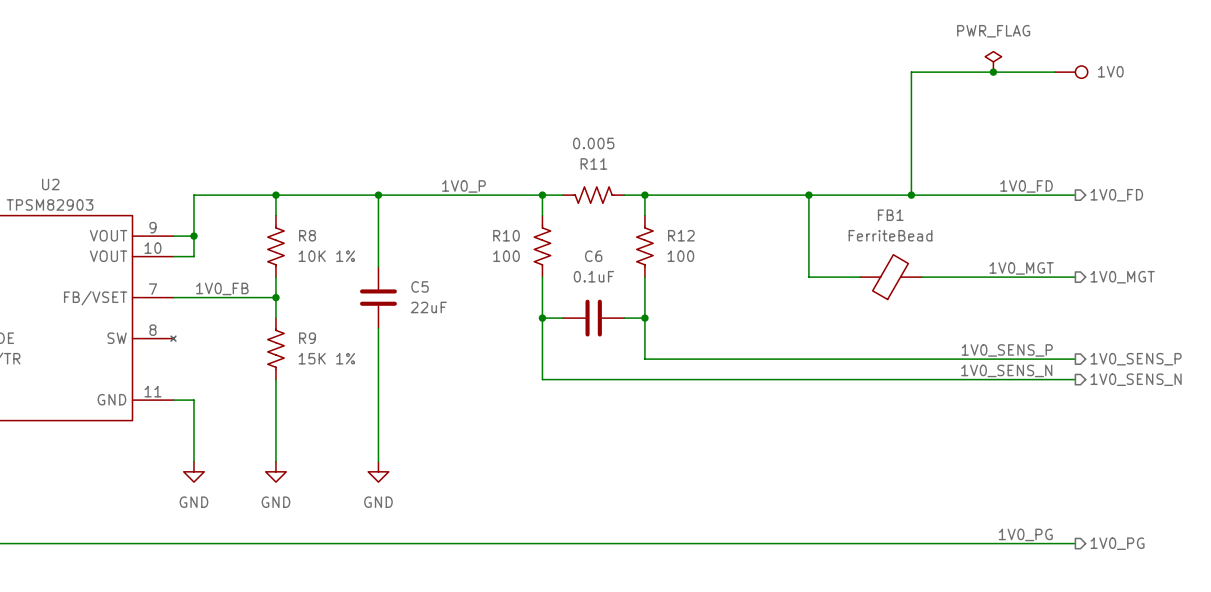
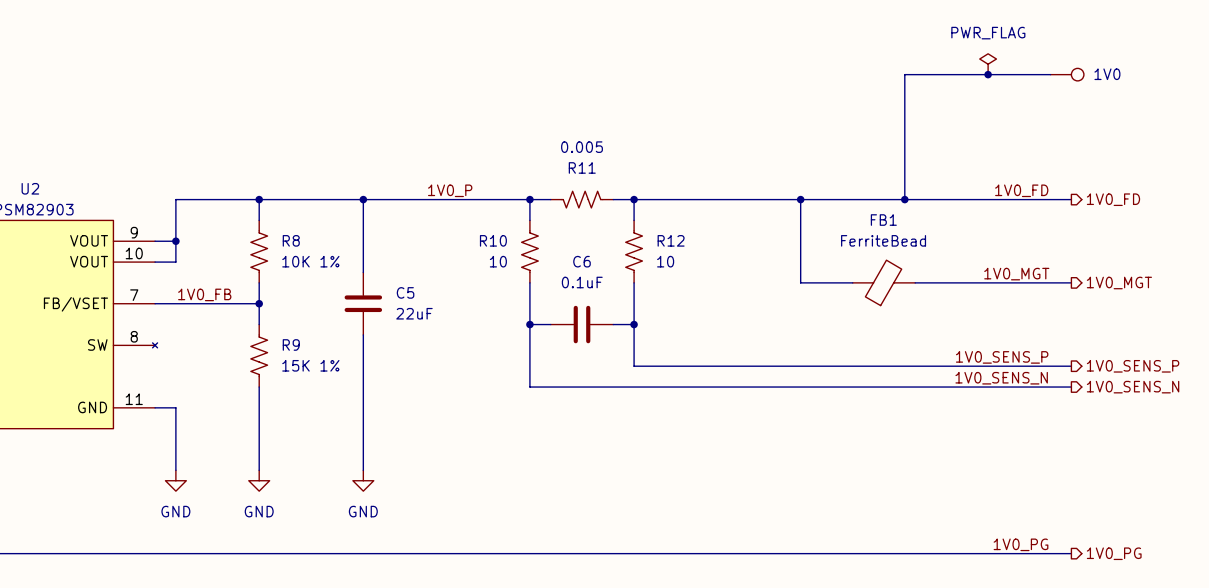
R10 value: 100 (506, 256) -> 10 (498, 261)
R12 value: 100 (680, 256) -> 10 (665, 261)

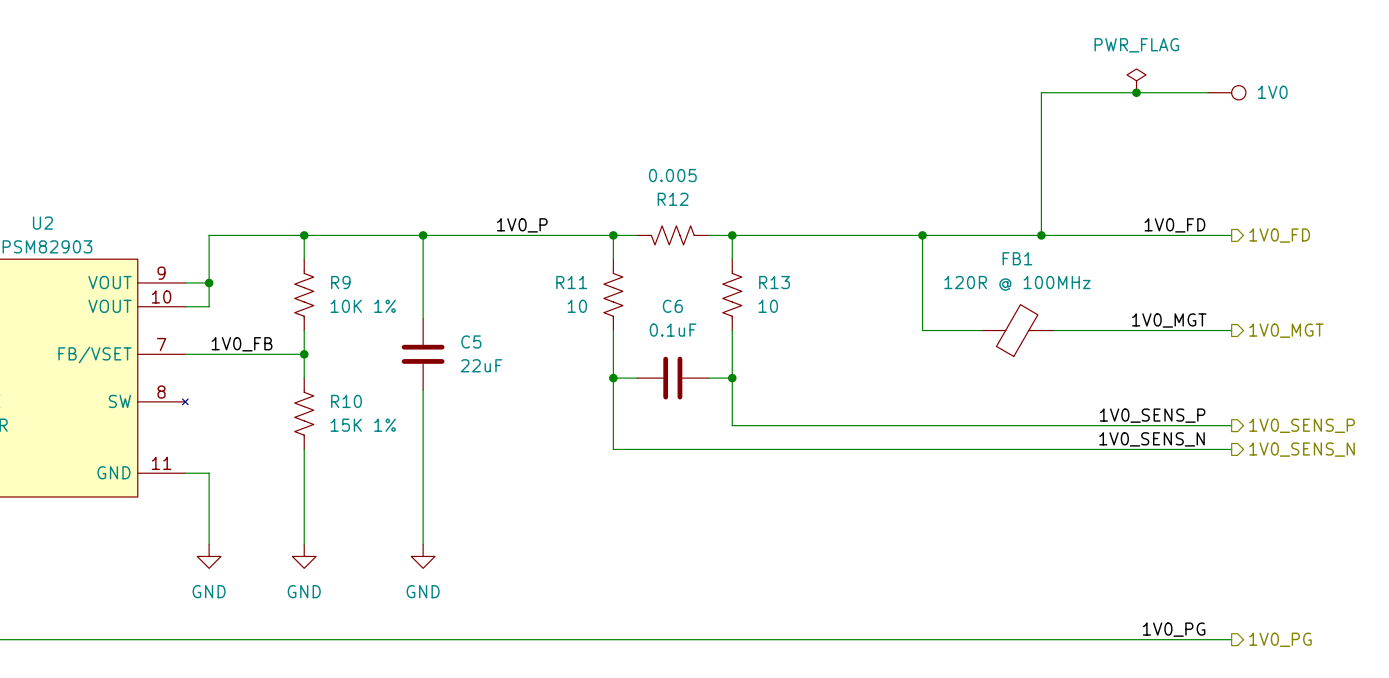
R11 name: R11 (582, 167) -> R12 (673, 199)
R8 name: R8 (291, 240) -> R9 (340, 282)
R10 name: R10 (493, 240) -> R11 (571, 282)
R12 name: R12 (671, 240) -> R13 (774, 282)
FB1 value: FerriteBead (883, 240) -> 120R @ 100MHz (1017, 283)
R9 name: R9 (291, 344) -> R10 (346, 401)

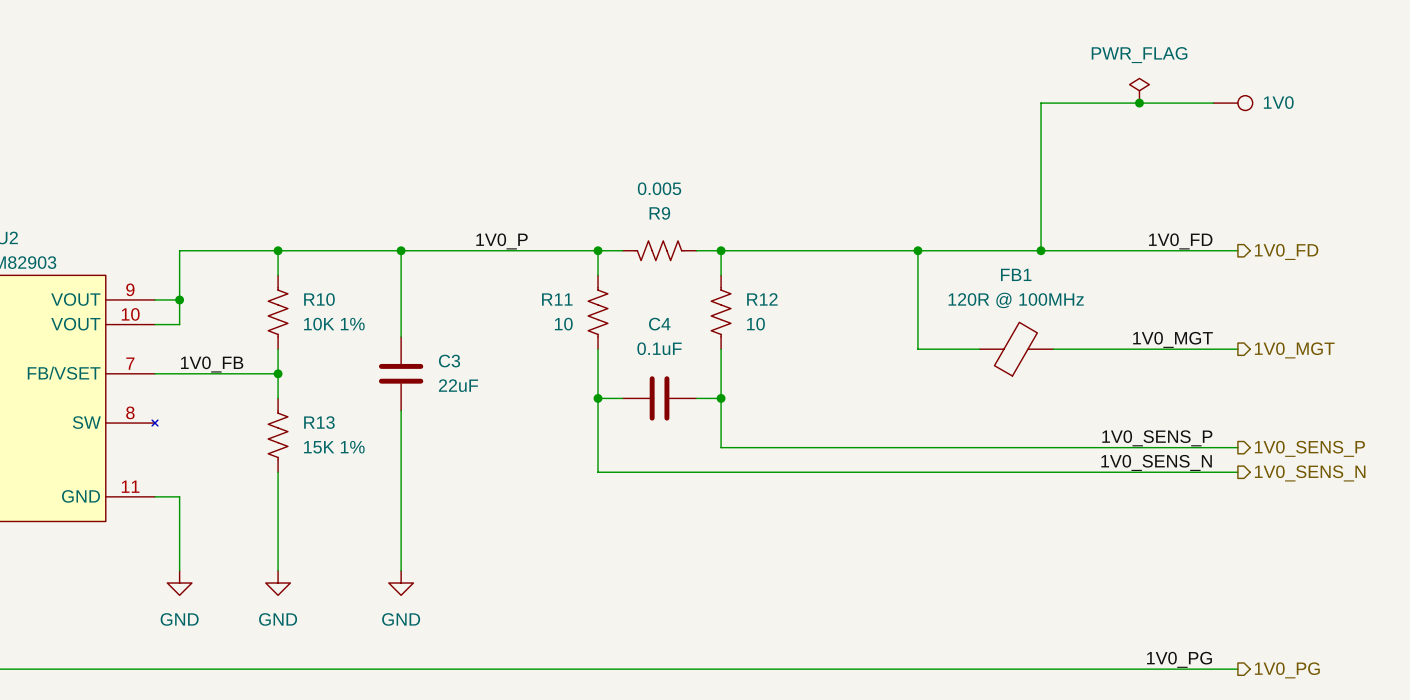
R12 name: R12 (673, 199) -> R9 (659, 213)
R9 name: R9 (340, 282) -> R10 (319, 299)
R13 name: R13 (774, 282) -> R12 (762, 299)
C6 name: C6 (672, 306) -> C4 (659, 324)
C5 name: C5 (471, 341) -> C3 (449, 361)
R10 name: R10 (346, 401) -> R13 (319, 422)

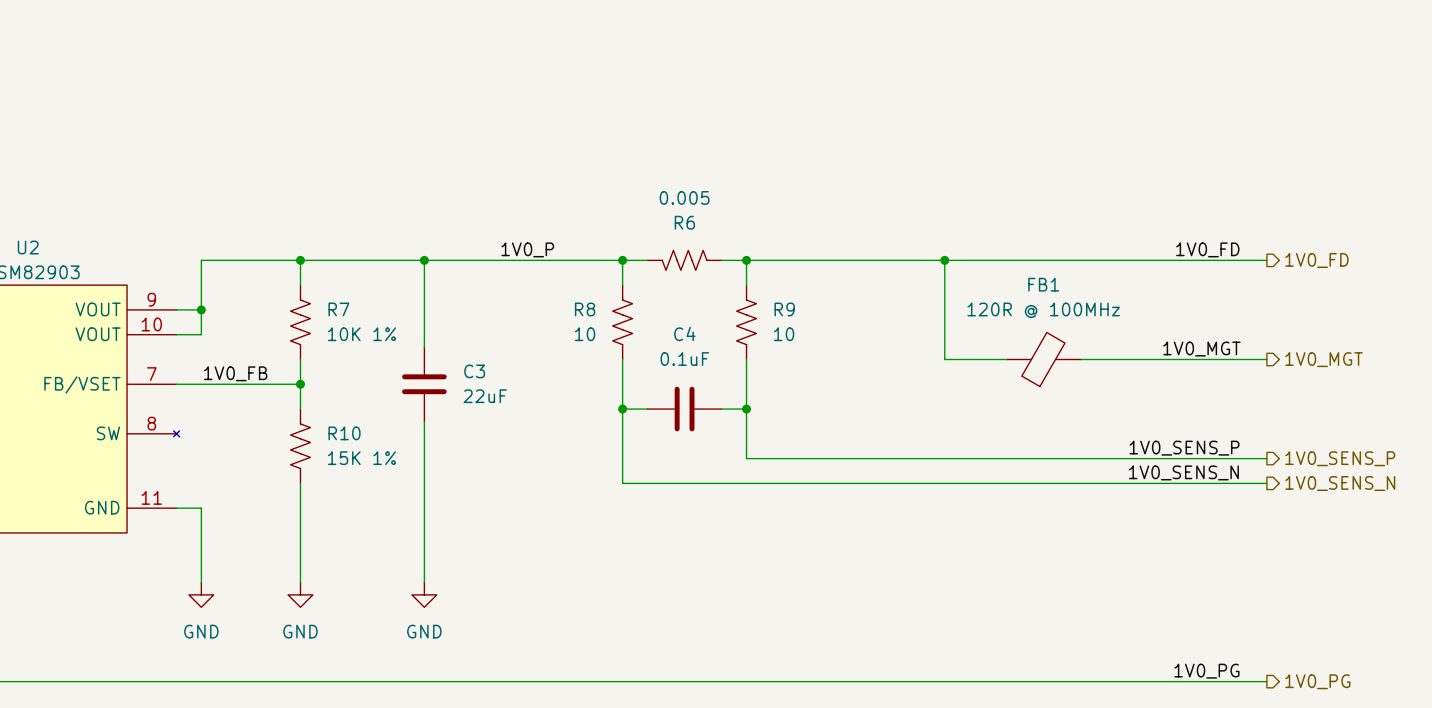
power symbol: PWR_FLAG (1139, 90) -> none
junction: (1139, 103) -> none
wire: (1213, 103) (1041, 103) (1041, 250) -> none
1V0: (1232, 103) -> none
R9 name: R9 (659, 213) -> R6 (684, 222)
junction: (1041, 250) -> none
R10 name: R10 (319, 299) -> R7 (338, 309)
R11 name: R11 (557, 299) -> R8 (585, 309)
R12 name: R12 (762, 299) -> R9 (784, 309)
R13 name: R13 (319, 422) -> R10 (344, 433)

